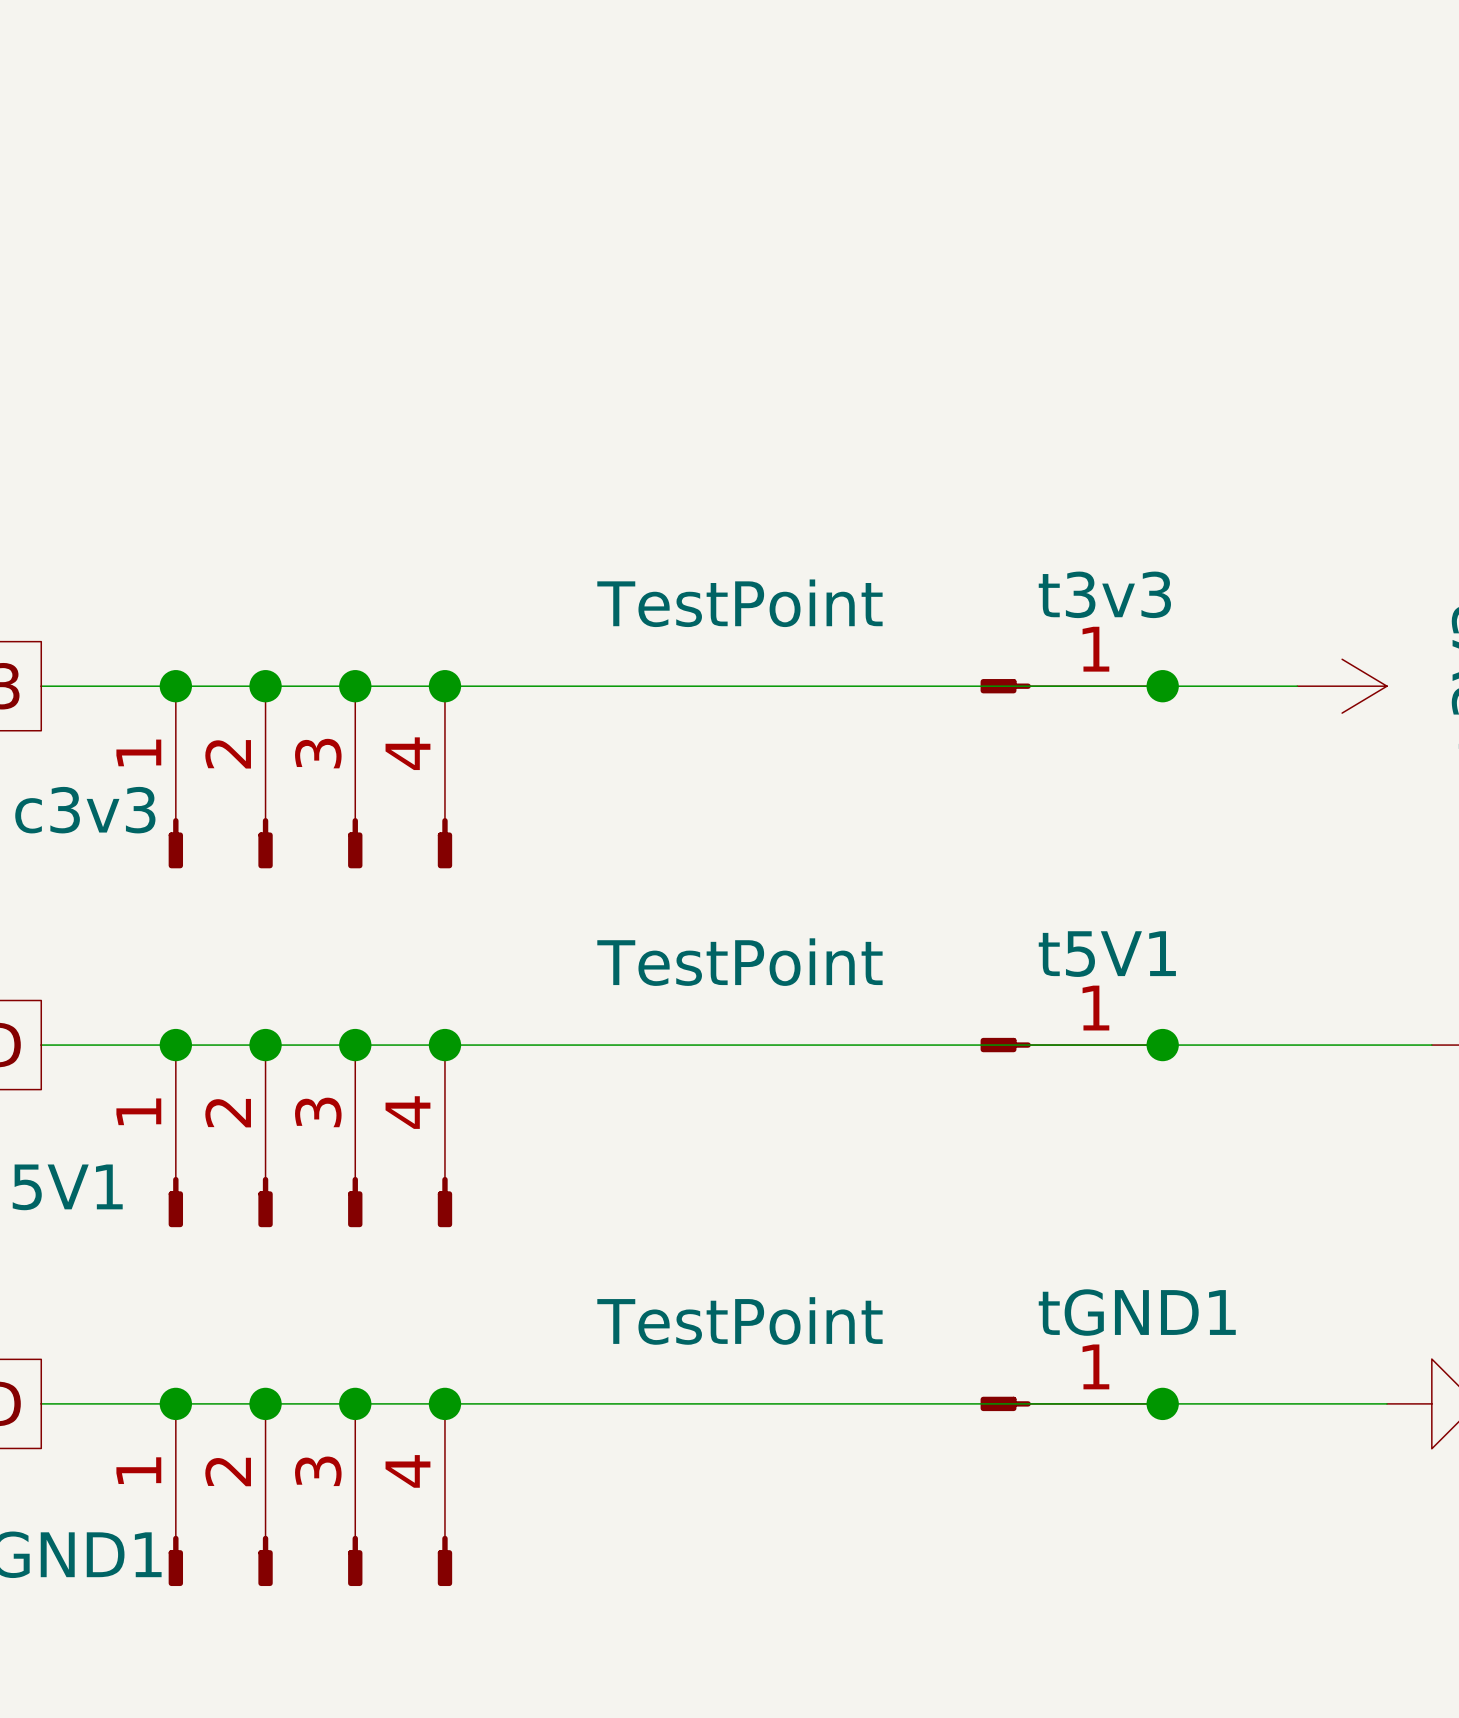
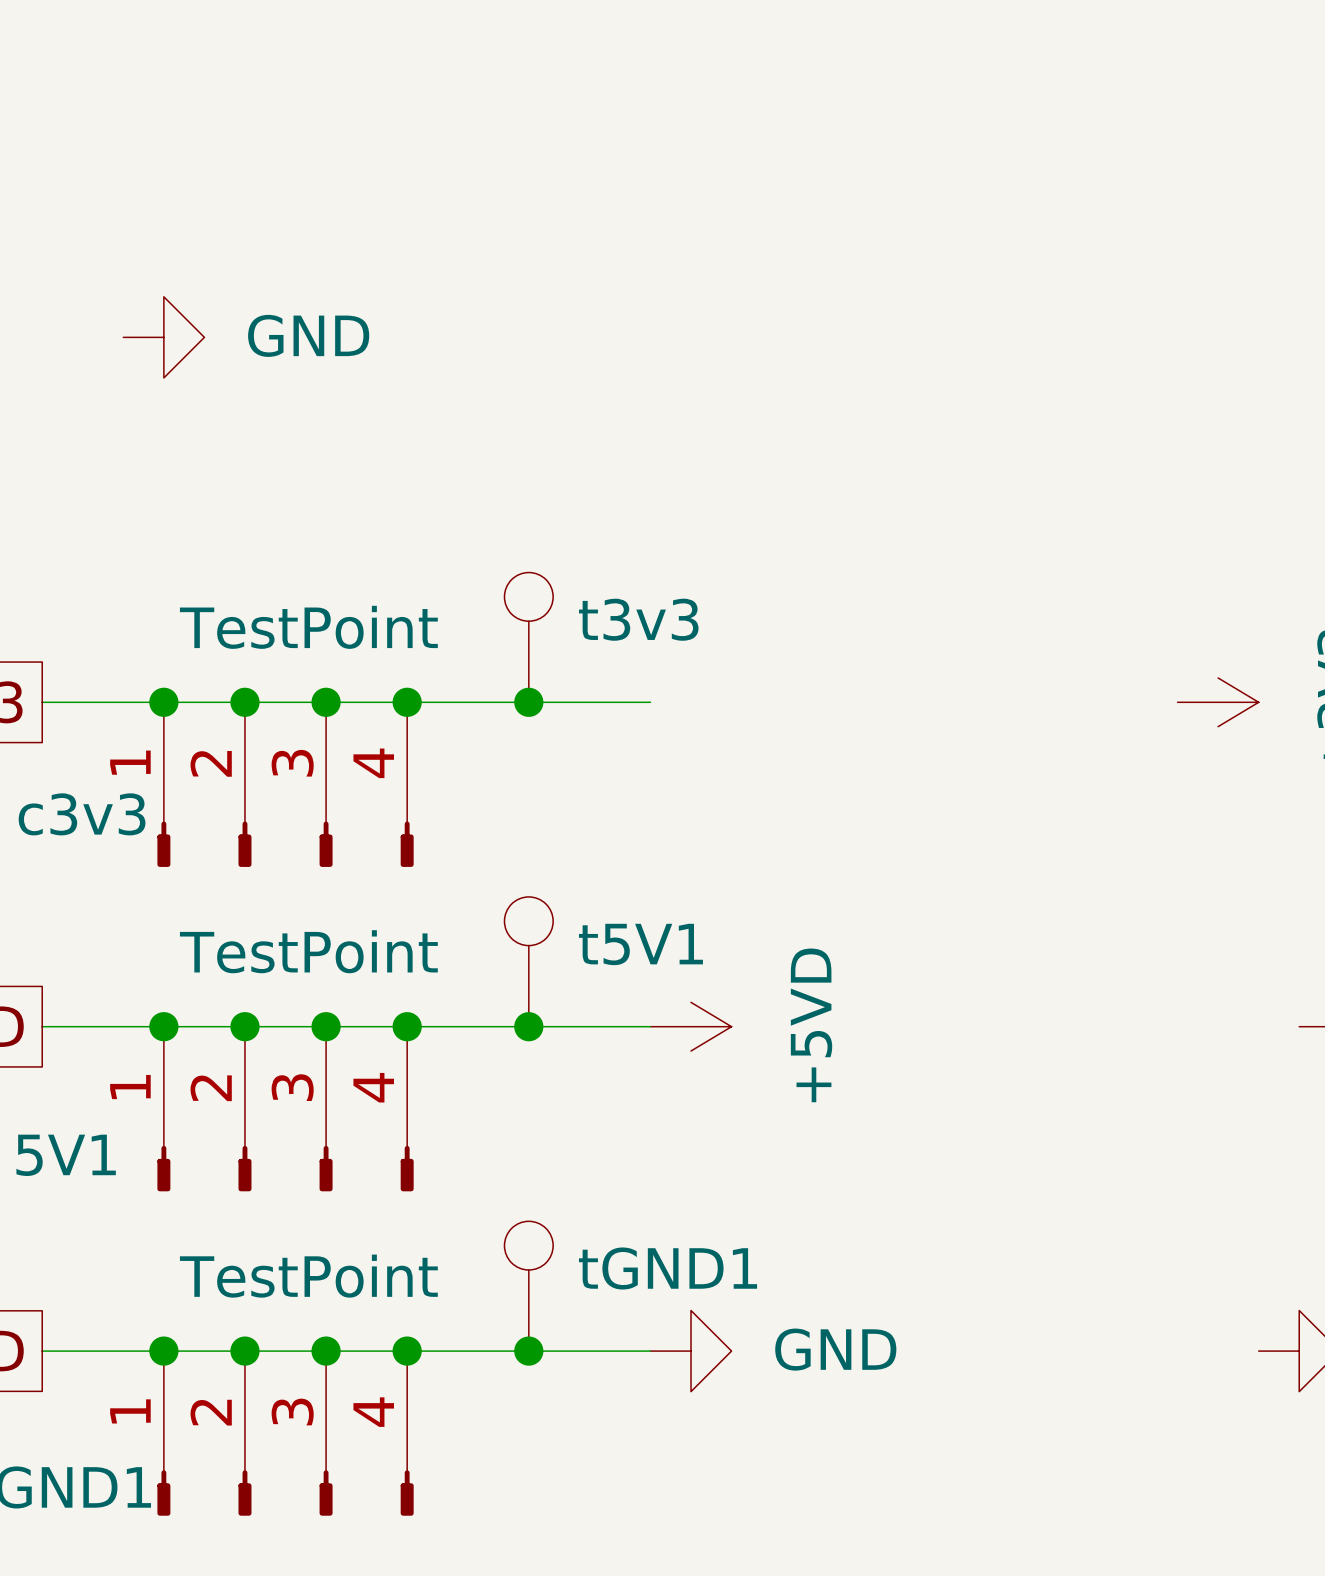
power symbol: none -> GND (163, 337)
t3v3 name position: t3v3 (1104, 594) -> t3v3 (638, 619)
t3v3 value position: TestPoint (739, 603) -> TestPoint (308, 627)
t3v3 symbol: [980, 679, 1163, 694] -> [504, 572, 554, 703]
junction: none -> (528, 702)
wire: (714, 686) (1297, 686) -> none
junction: (1162, 686) -> none
t5V1 name position: t5V1 (1107, 954) -> t5V1 (640, 944)
t5V1 value position: TestPoint (739, 962) -> TestPoint (308, 951)
t5V1 symbol: [980, 1037, 1163, 1053] -> [504, 896, 554, 1027]
junction: none -> (528, 1026)
wire: (714, 1045) (1431, 1045) -> none
power symbol: none -> +5VD (691, 1026)
junction: (1162, 1045) -> none
tGND1 name position: tGND1 (1137, 1312) -> tGND1 (668, 1268)
tGND1 value position: TestPoint (739, 1320) -> TestPoint (308, 1276)
tGND1 symbol: [980, 1396, 1163, 1412] -> [504, 1221, 554, 1352]
junction: none -> (528, 1351)
wire: (714, 1403) (1386, 1403) -> none
power symbol: none -> GND (691, 1351)
junction: (1162, 1403) -> none

